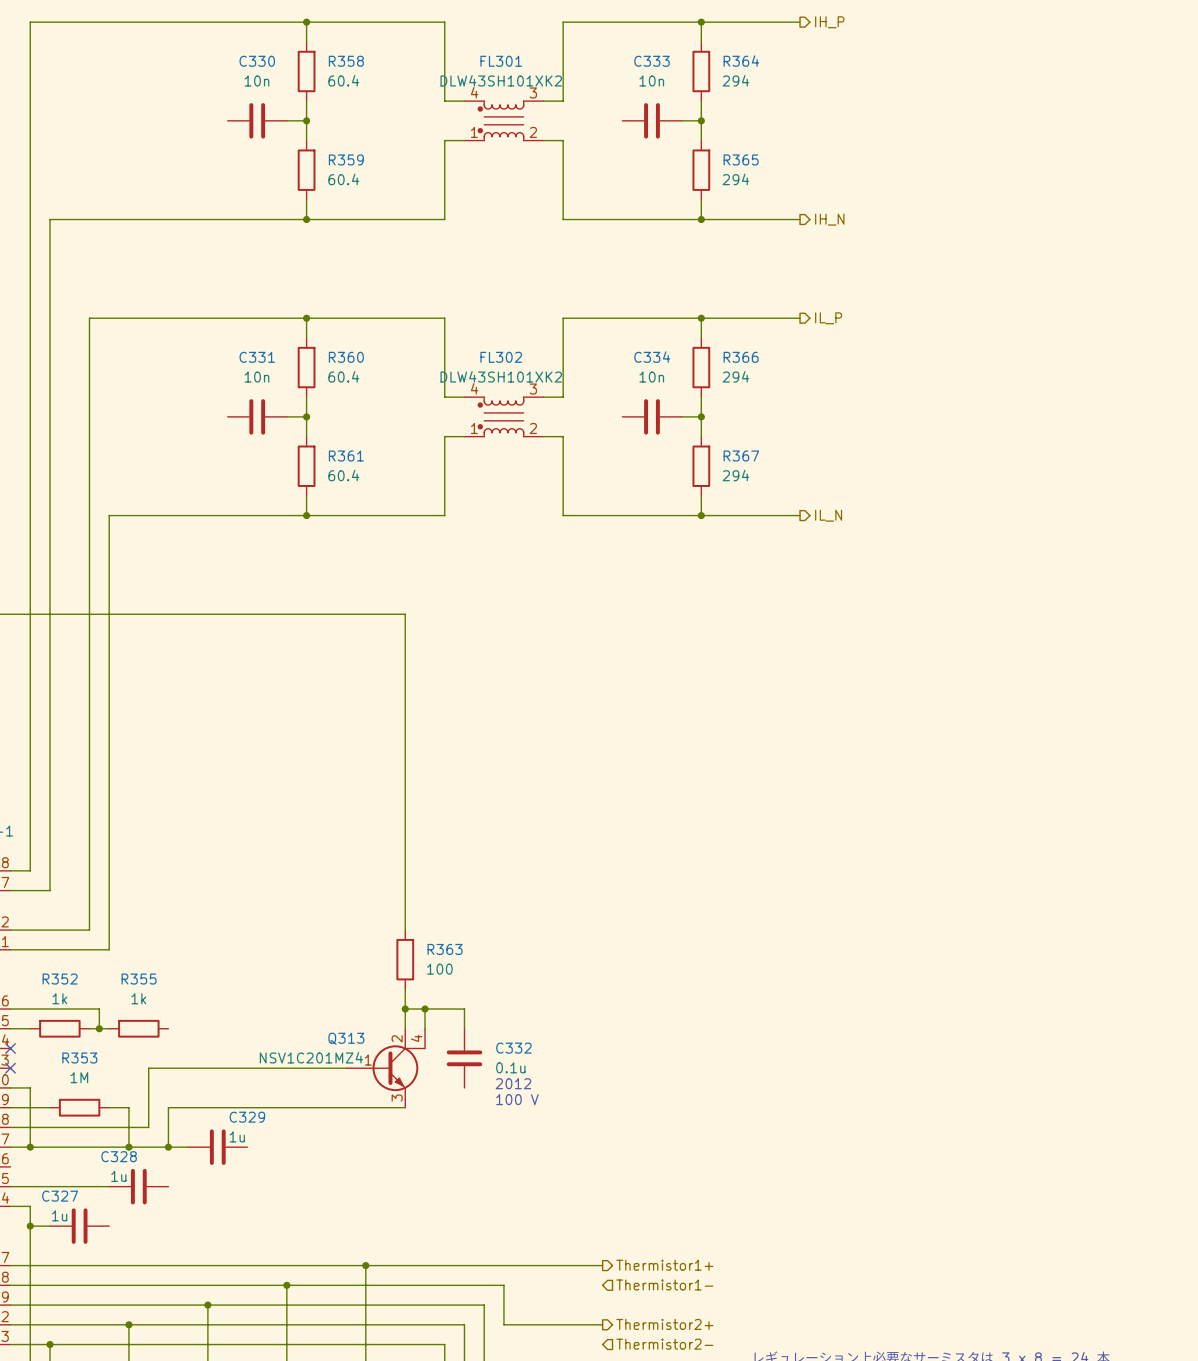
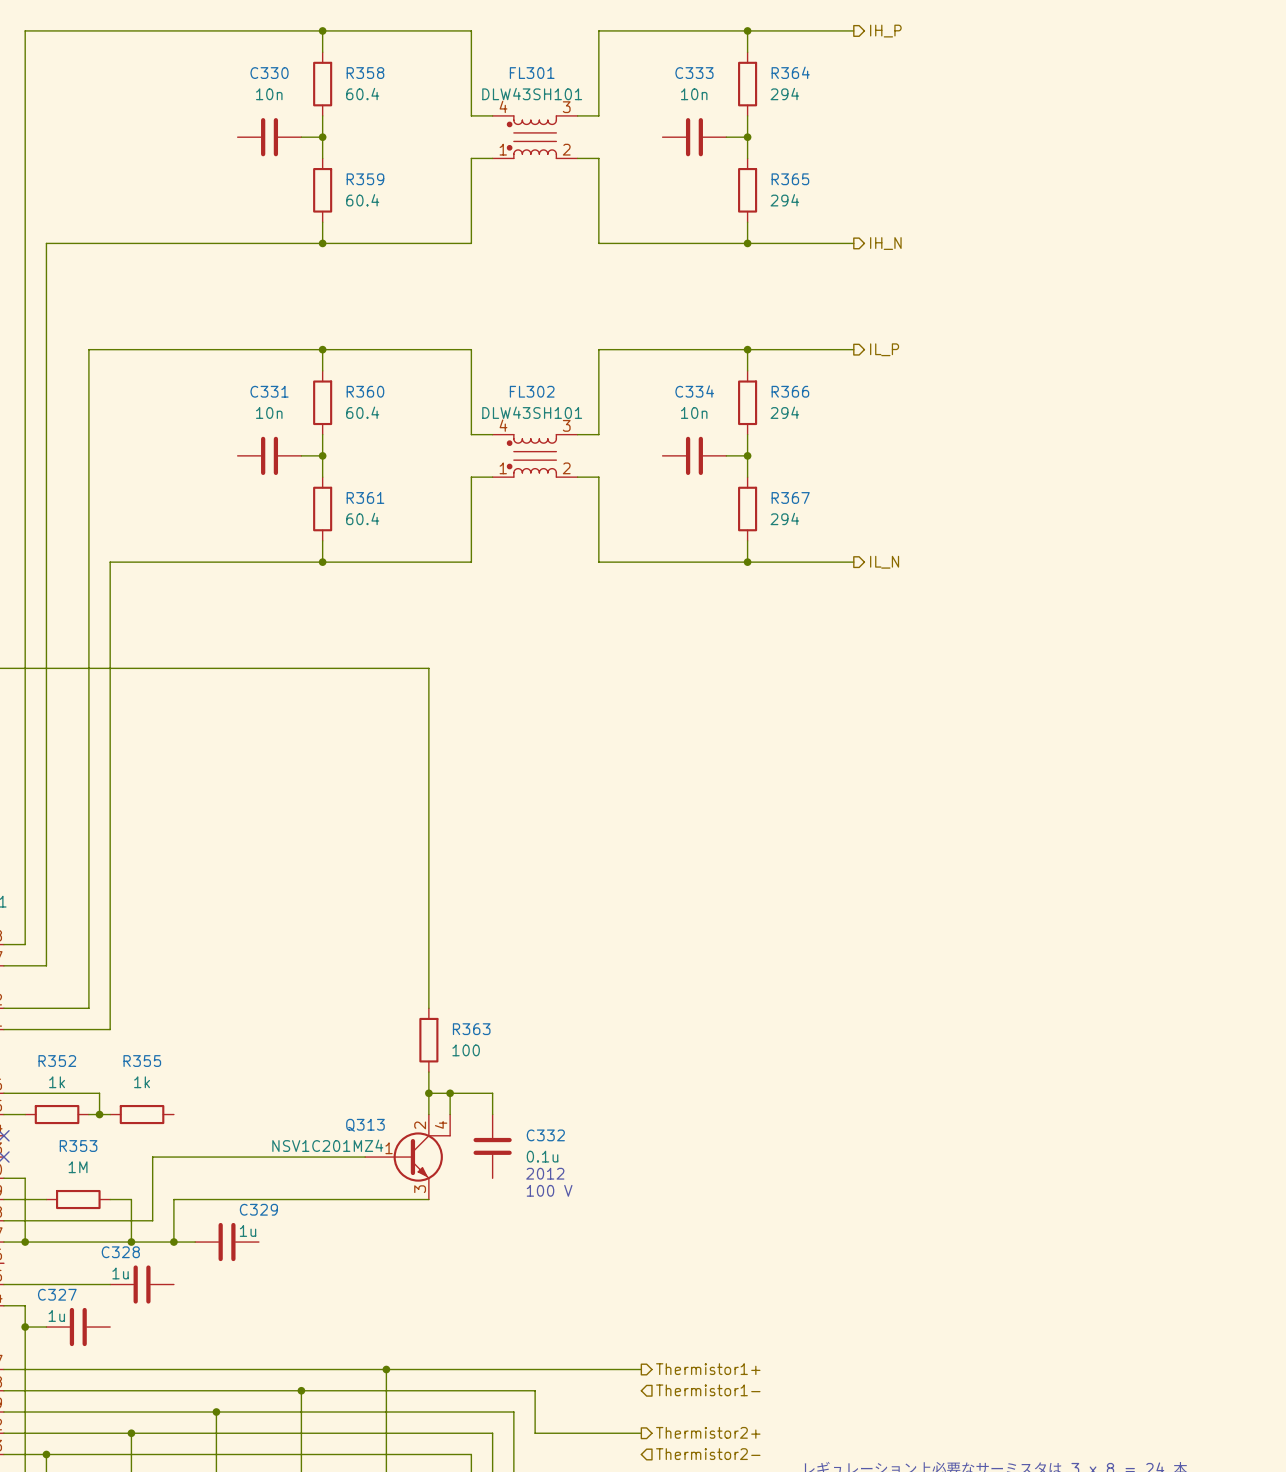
FL301 value: DLW43SH101XK2 (501, 80) -> DLW43SH101 (532, 94)
FL302 value: DLW43SH101XK2 (501, 376) -> DLW43SH101 (532, 412)

